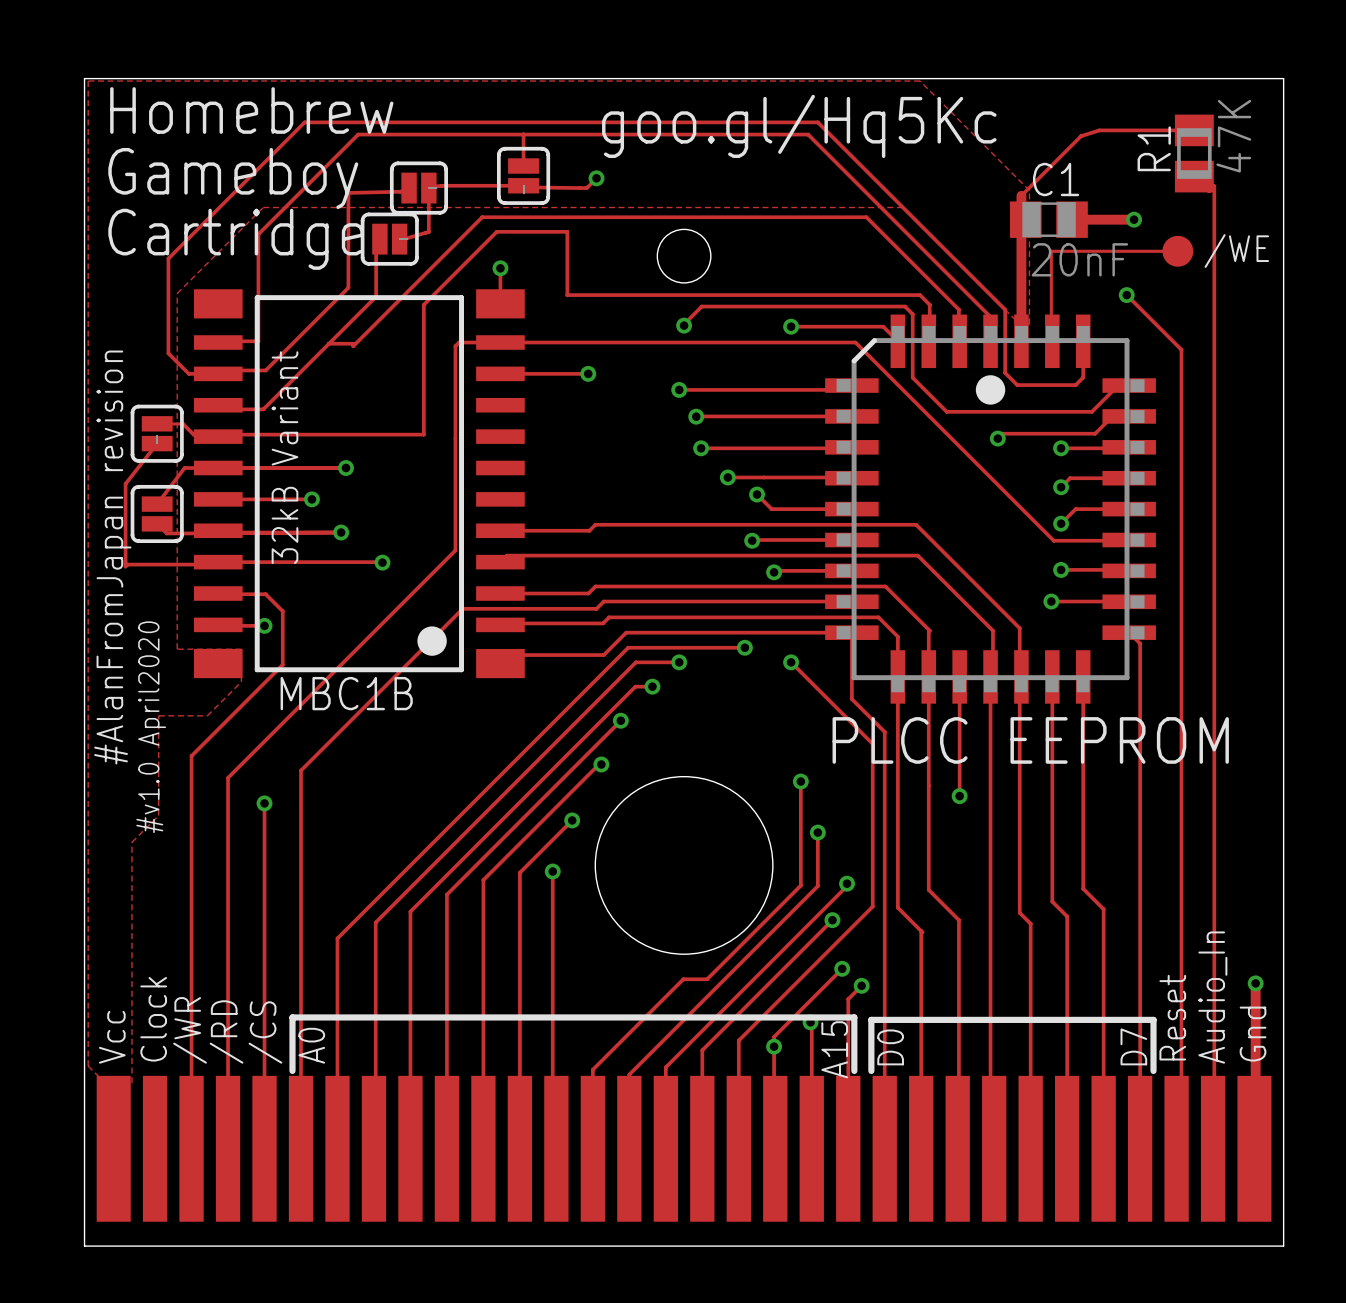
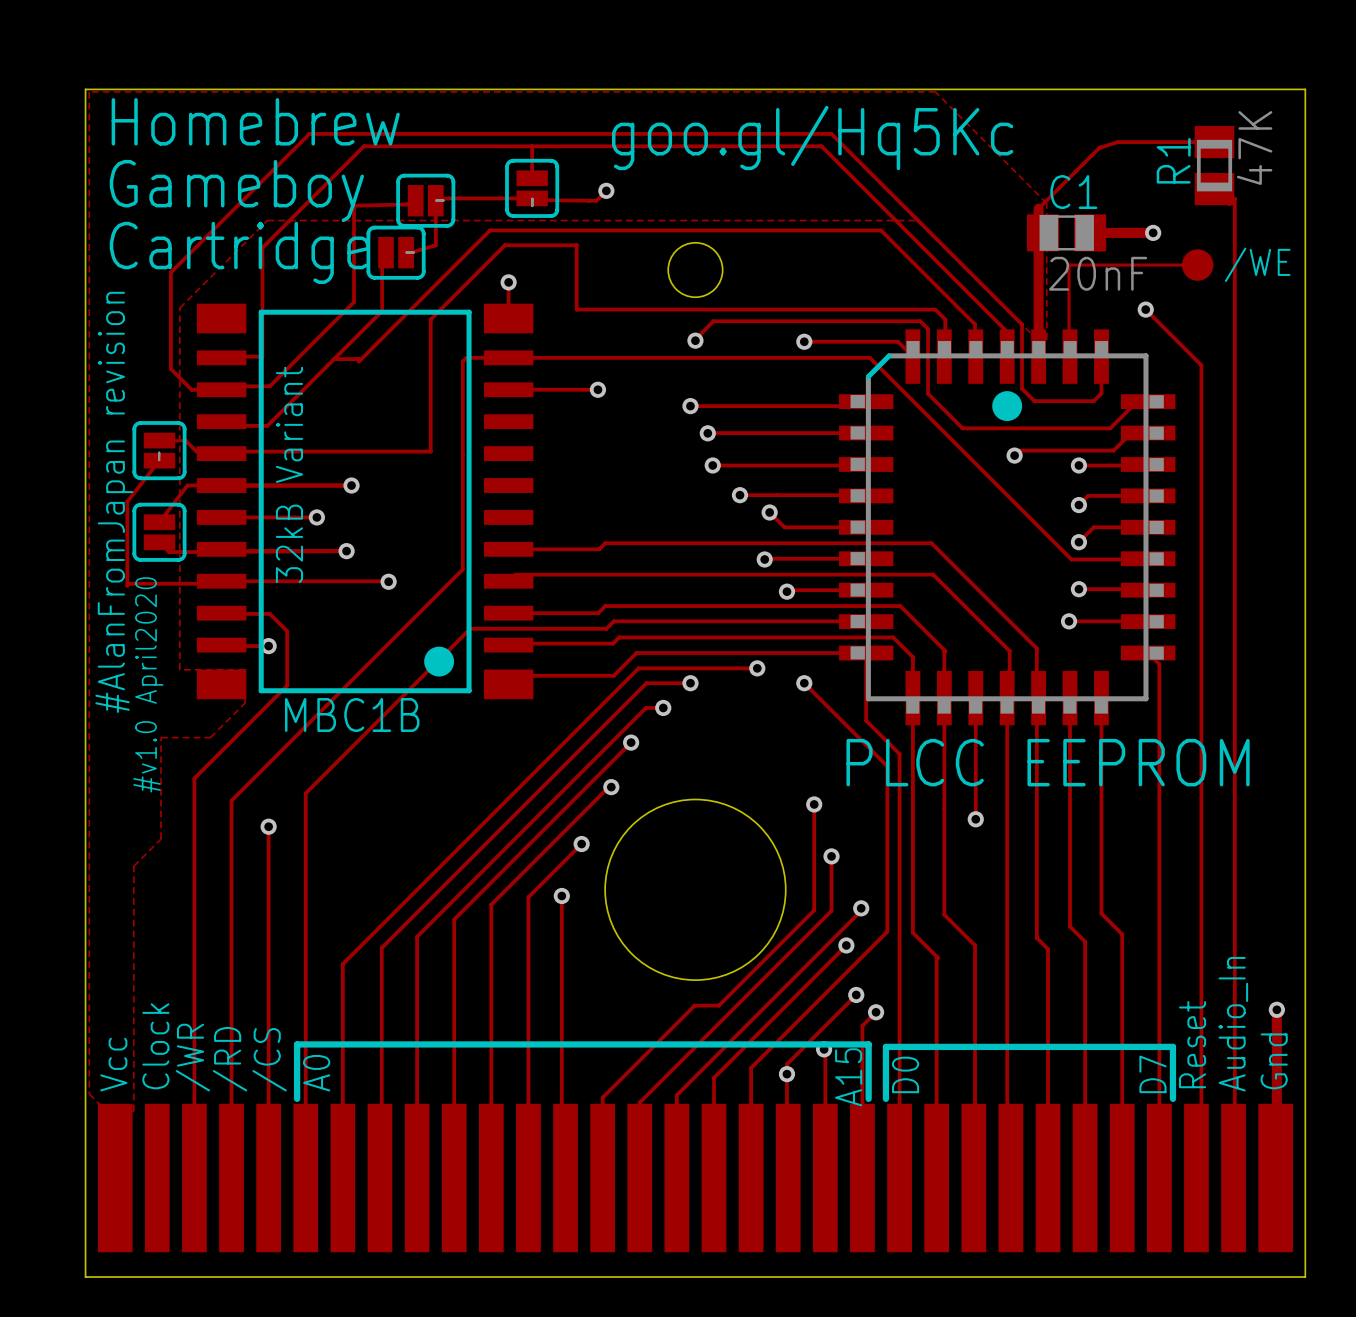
text position: #AlanFromJapan revision (112, 557) -> #AlanFromJapan revision (114, 502)
text position: #v1.0 April2020 (151, 727) -> #v1.0 April2020 (148, 684)

